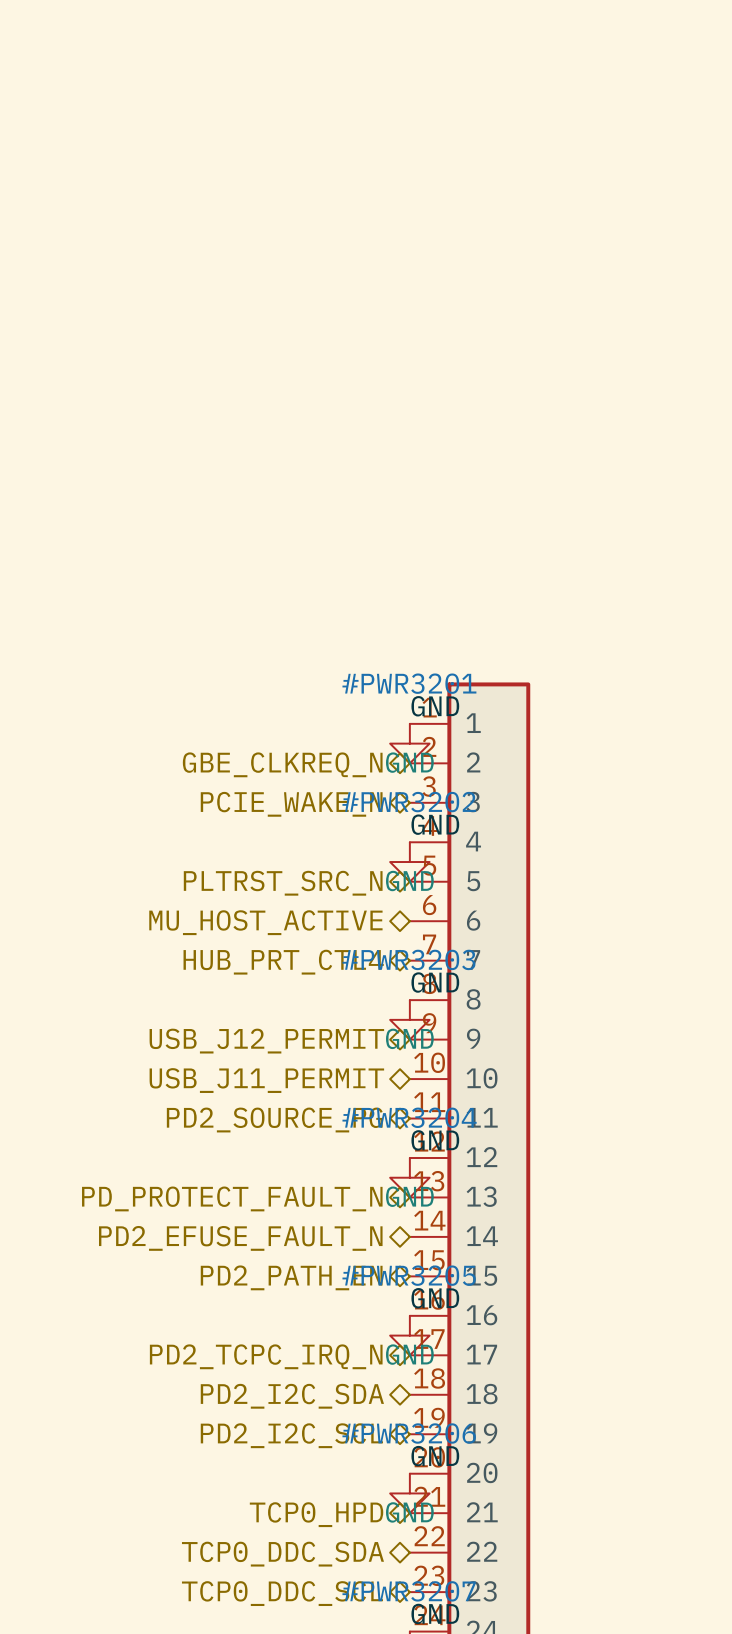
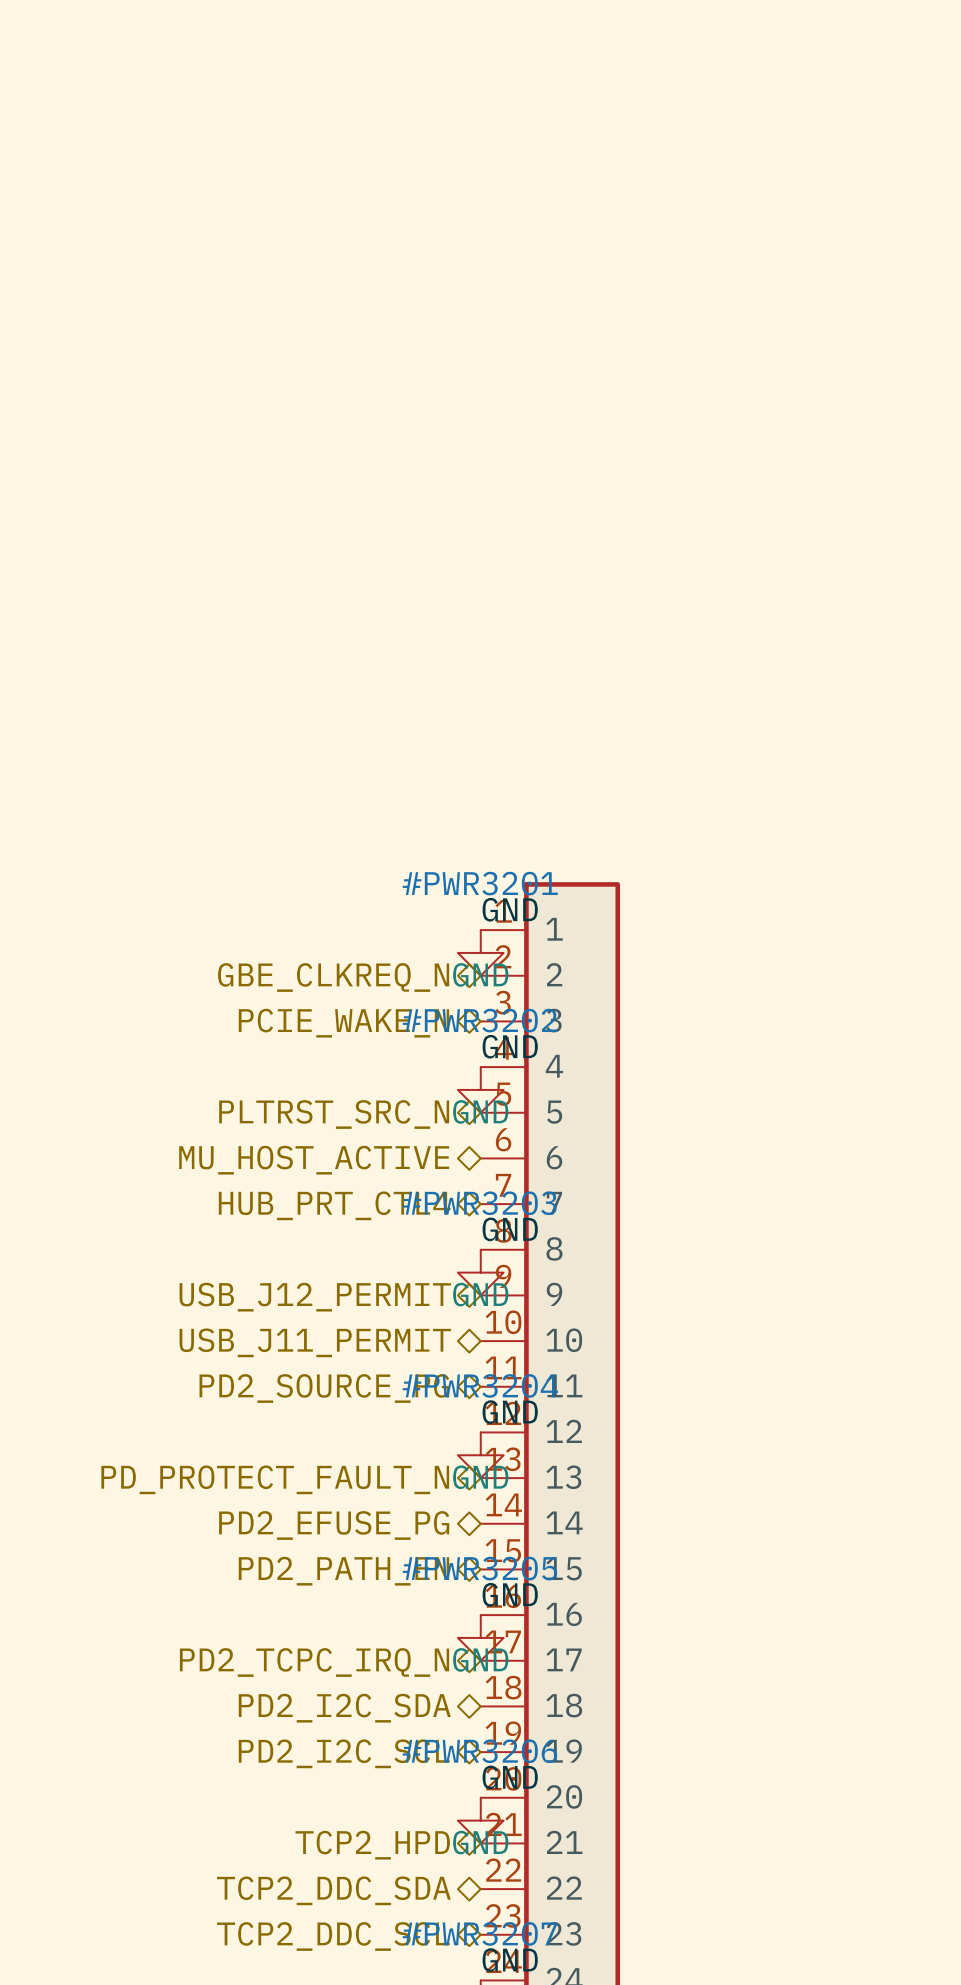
hierarchical label: PD2_EFUSE_FAULT_N (240, 1238) -> PD2_EFUSE_PG (334, 1525)
hierarchical label: TCP0_HPD (316, 1514) -> TCP2_HPD (372, 1845)
hierarchical label: TCP0_DDC_SDA (282, 1554) -> TCP2_DDC_SDA (333, 1890)
hierarchical label: TCP0_DDC_SCL (282, 1593) -> TCP2_DDC_SCL (333, 1936)

